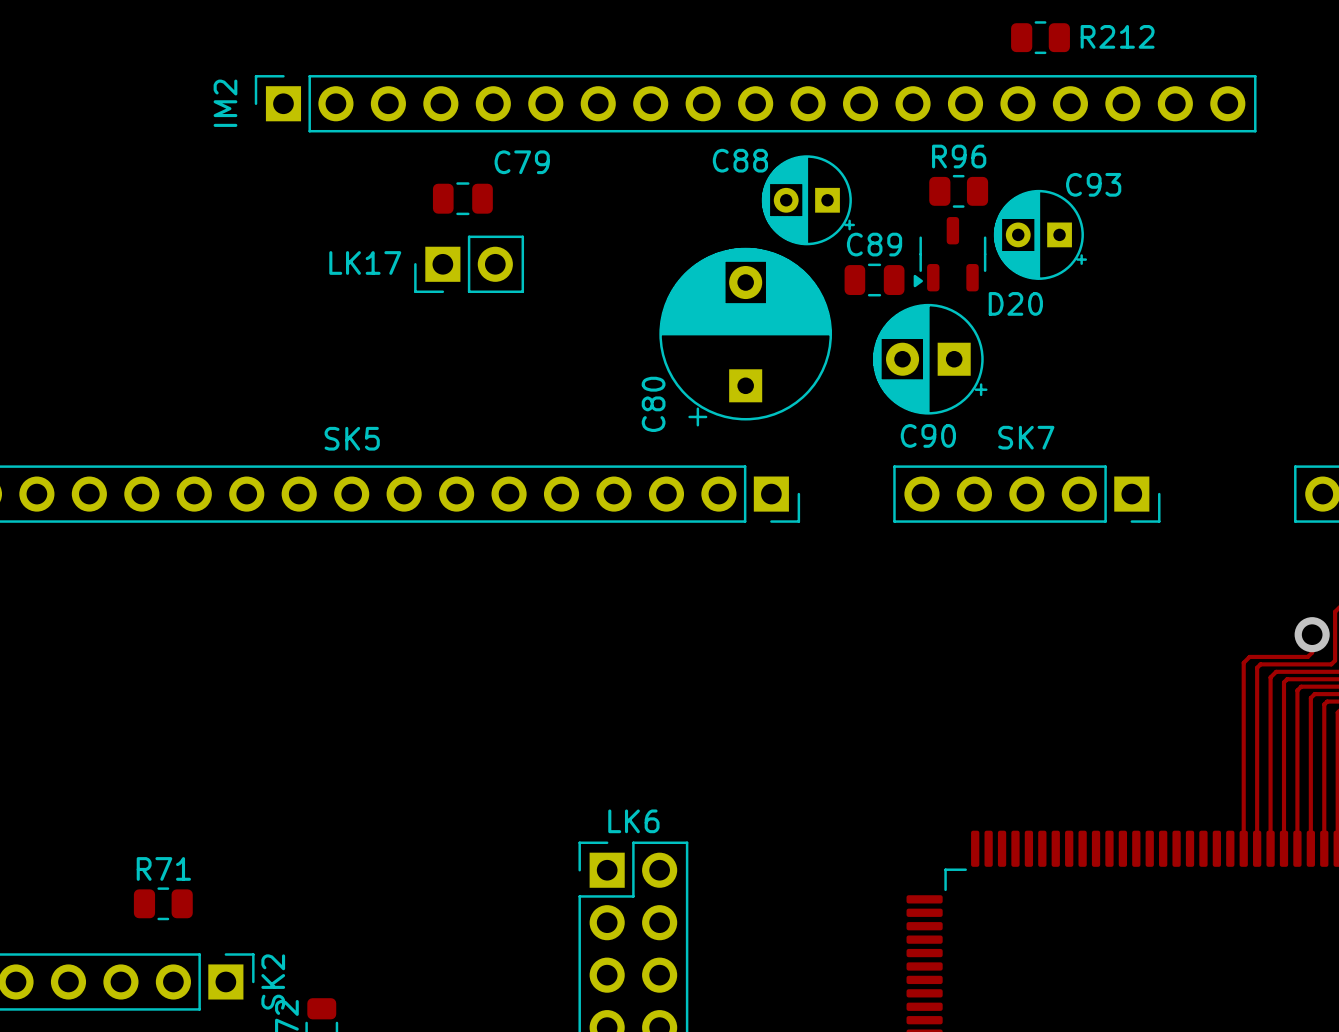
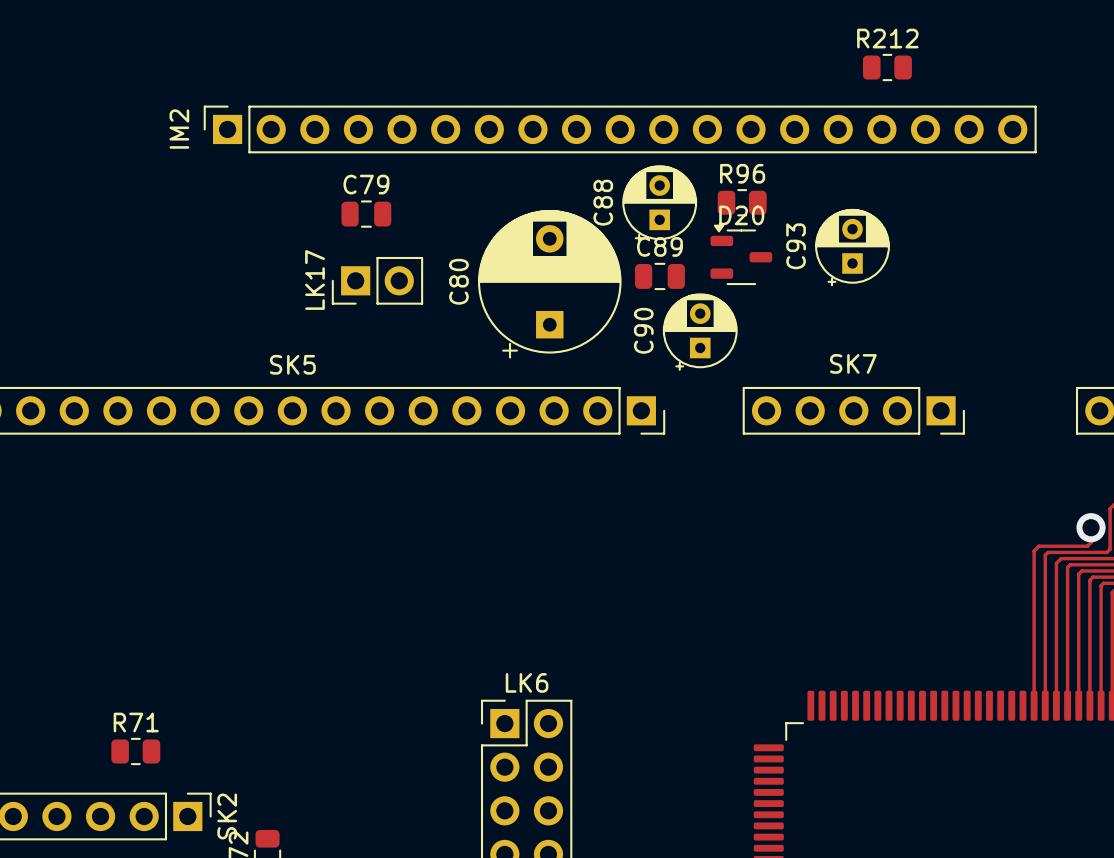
R212 name position: R212 (1117, 36) -> R212 (887, 38)
R212 position: (1040, 37) -> (887, 67)
IM2 position: (755, 103) -> (620, 129)
C79 name position: C79 (522, 162) -> C79 (366, 184)
C93 name position: C93 (1093, 184) -> C93 (796, 246)
R96 position: (958, 191) -> (742, 202)
C79 position: (462, 198) -> (366, 214)
C88 rotation: 0° (808, 200) -> 90° clockwise (659, 203)
C93 rotation: 0° (1040, 234) -> 90° clockwise (852, 247)
C93 position: (1040, 234) -> (852, 247)
D20 rotation: 0° (950, 254) -> 90° clockwise (741, 254)
D20 position: (950, 254) -> (741, 254)
LK17 name rotation: 0° (365, 262) -> 90° counterclockwise (315, 279)
LK17 position: (469, 264) -> (377, 280)
C89 position: (874, 280) -> (659, 276)
C90 footprint: [873, 303, 988, 415] -> [662, 293, 738, 371]
D20 name position: D20 (1015, 303) -> D20 (741, 215)
C80 position: (745, 337) -> (549, 284)
C80 name position: C80 (653, 404) -> C80 (458, 281)
C90 name position: C90 (928, 435) -> C90 (643, 330)

